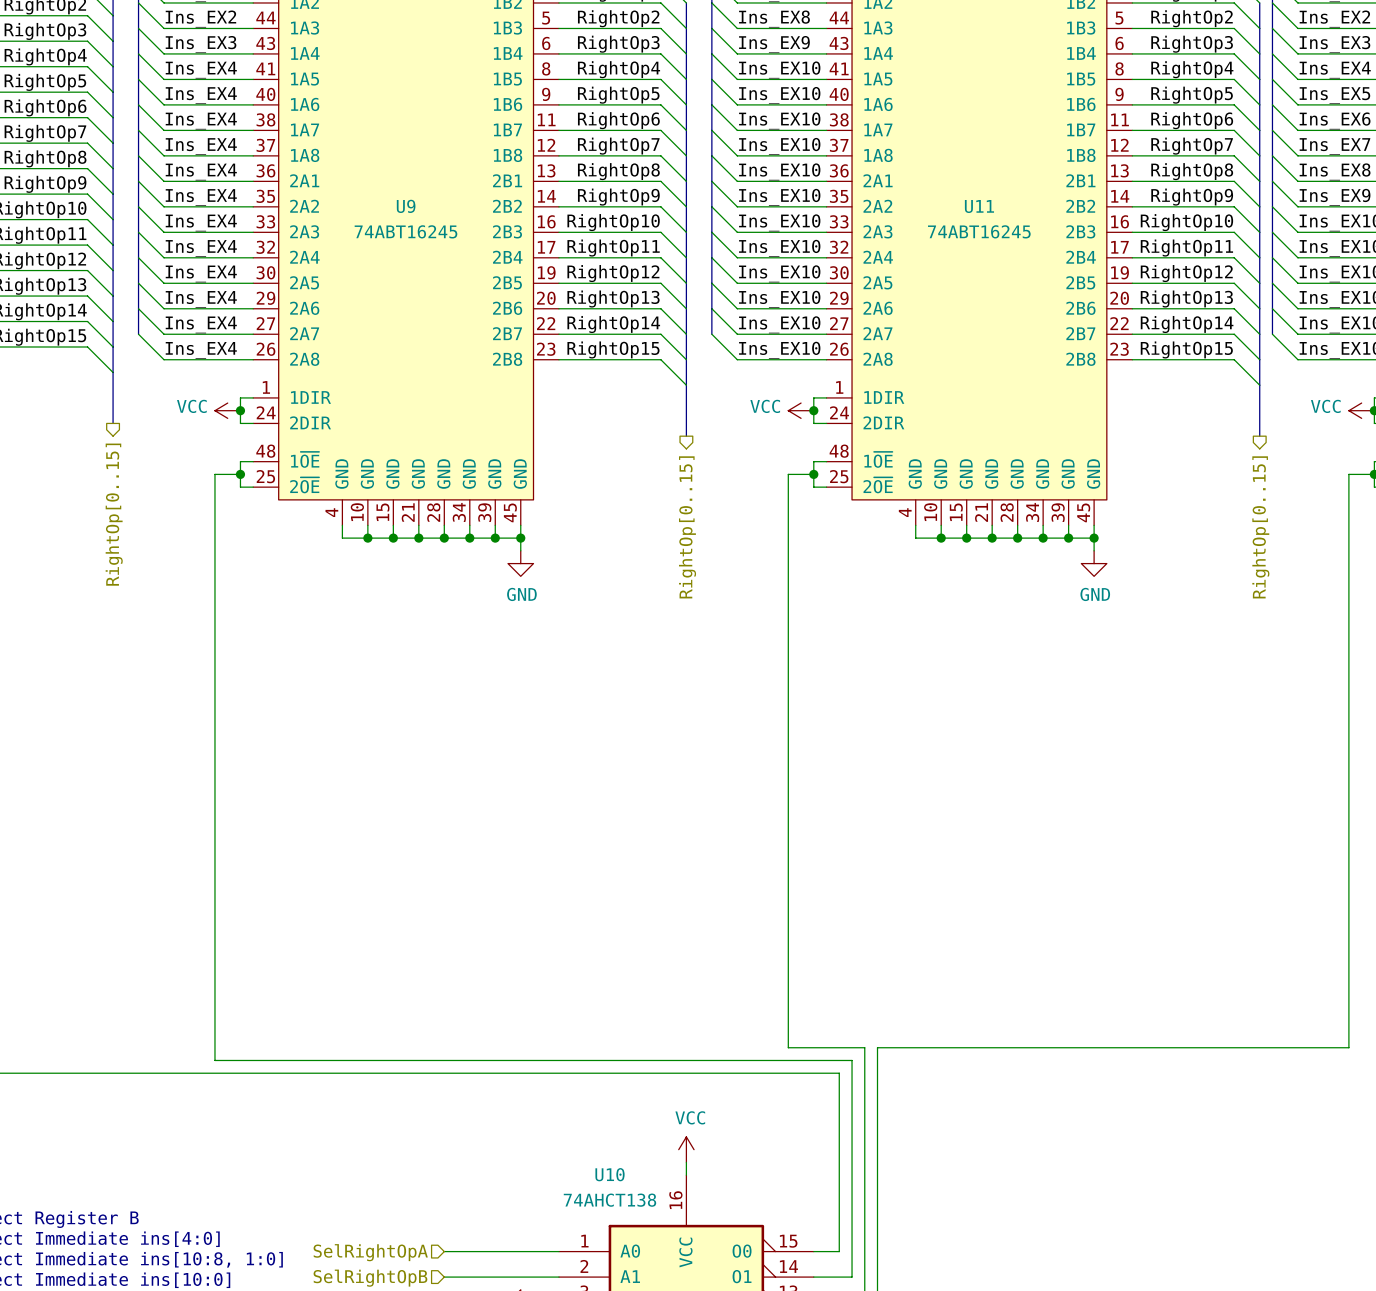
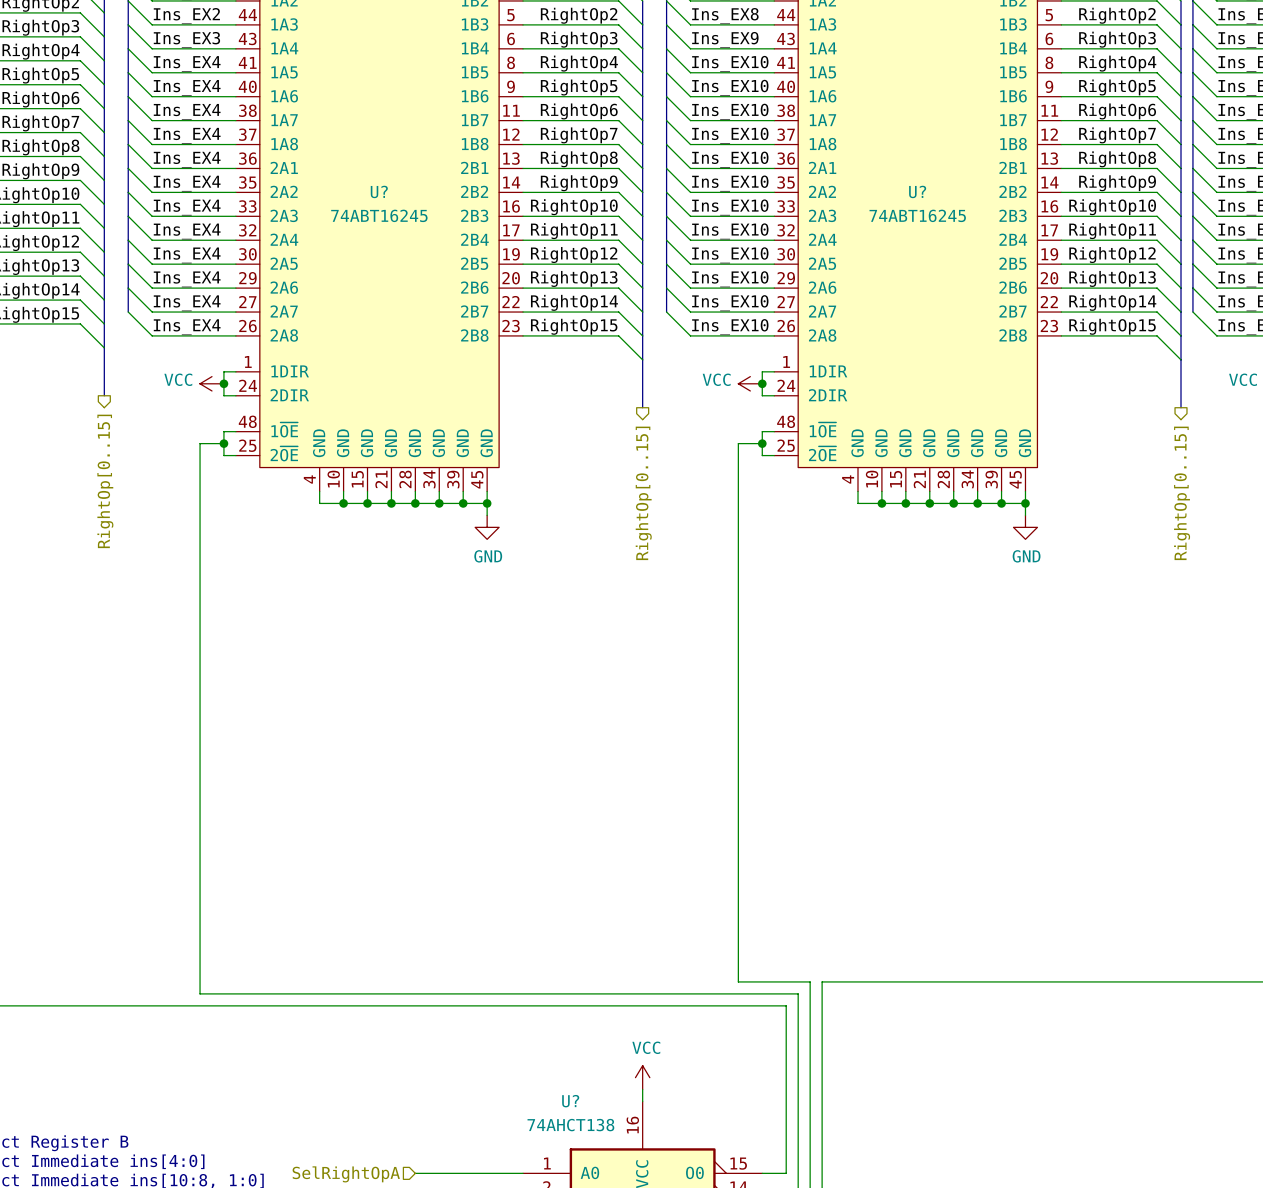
U9 name: U9 (406, 206) -> U? (379, 191)
U11 name: U11 (979, 206) -> U? (917, 191)
U10 name: U10 (610, 1174) -> U? (570, 1101)

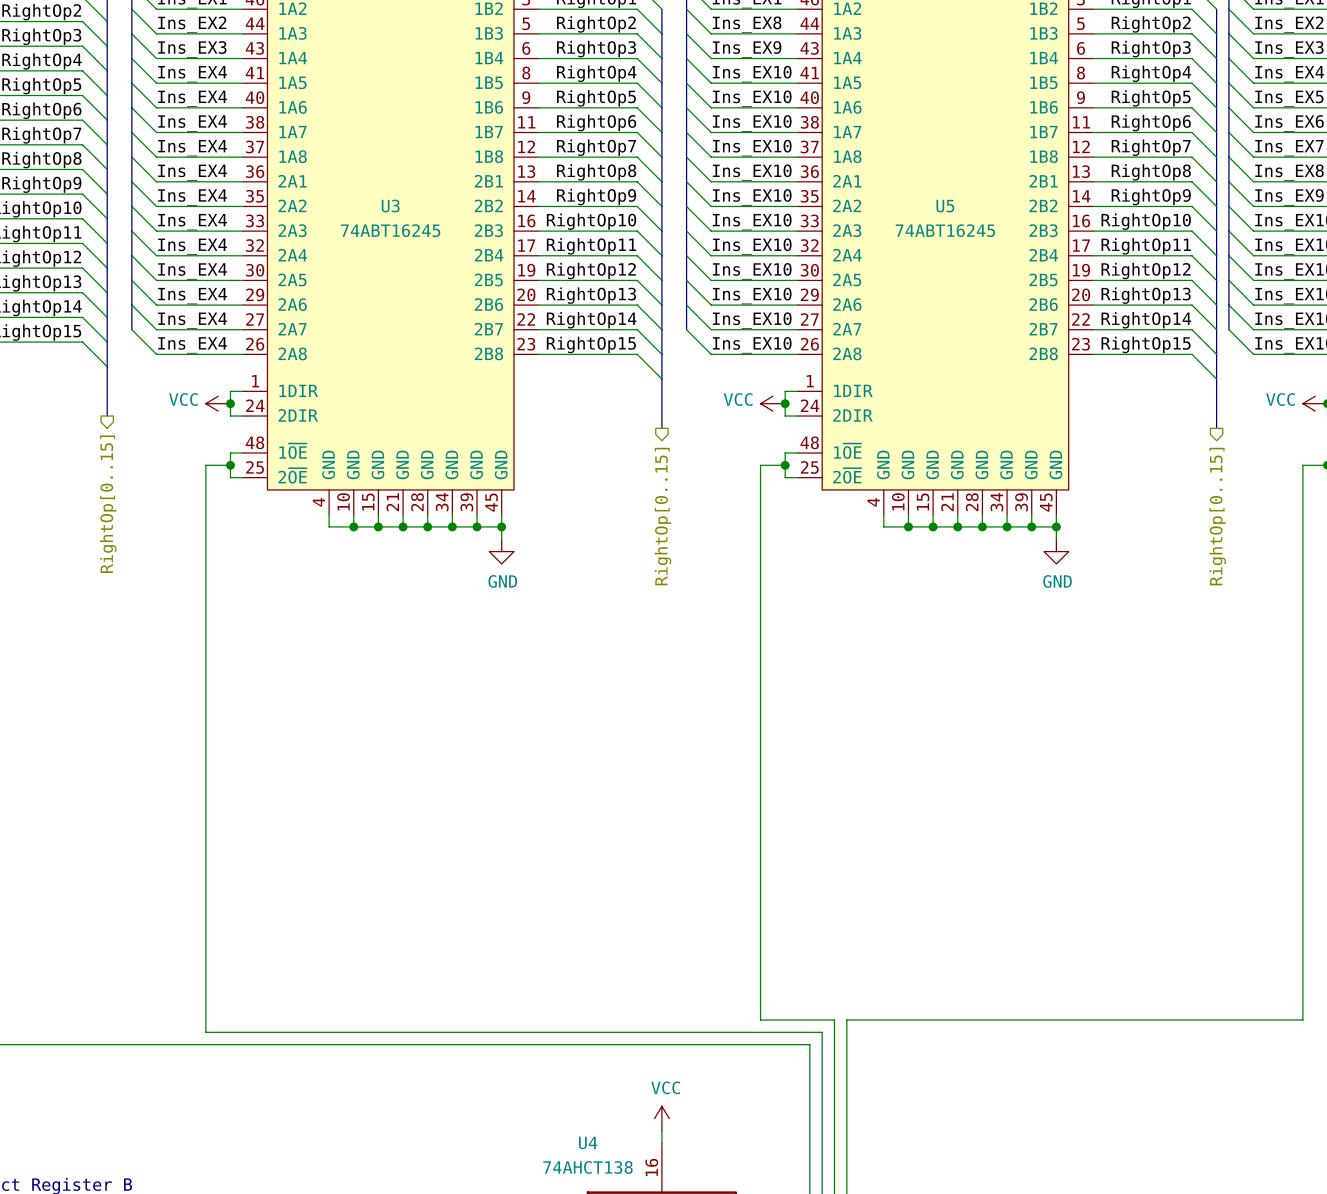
U? name: U? (379, 191) -> U3 (390, 206)
U? name: U? (917, 191) -> U5 (945, 206)
U? name: U? (570, 1101) -> U4 (588, 1142)

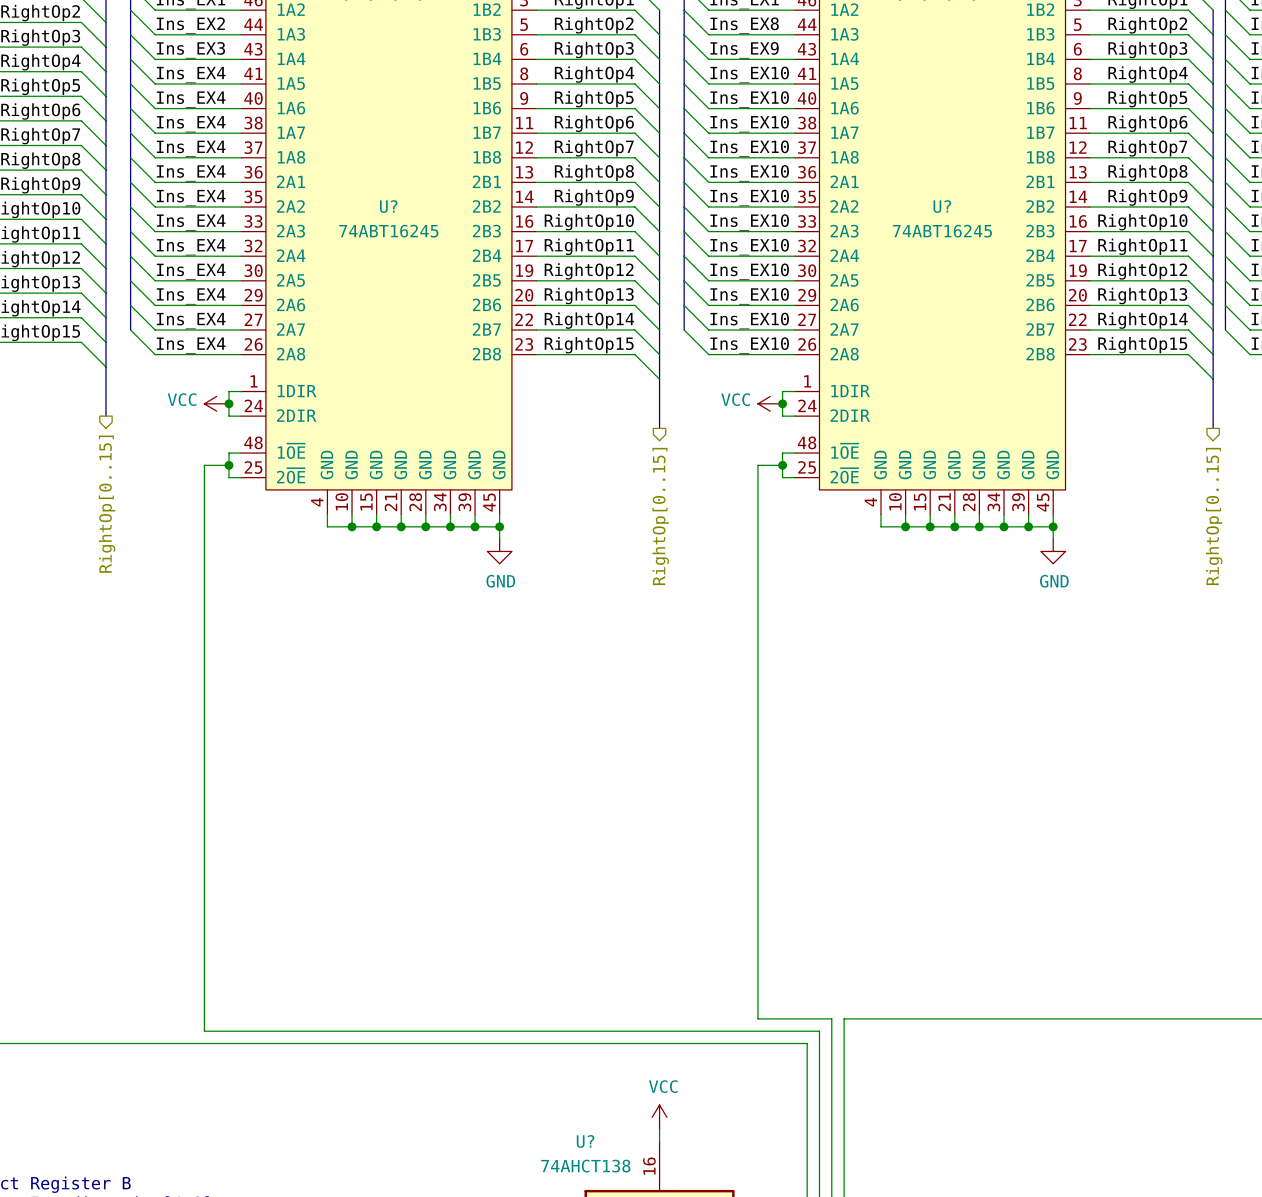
U3 name: U3 (390, 206) -> U? (388, 206)
U5 name: U5 (945, 206) -> U? (942, 206)
U4 name: U4 (588, 1142) -> U? (585, 1141)

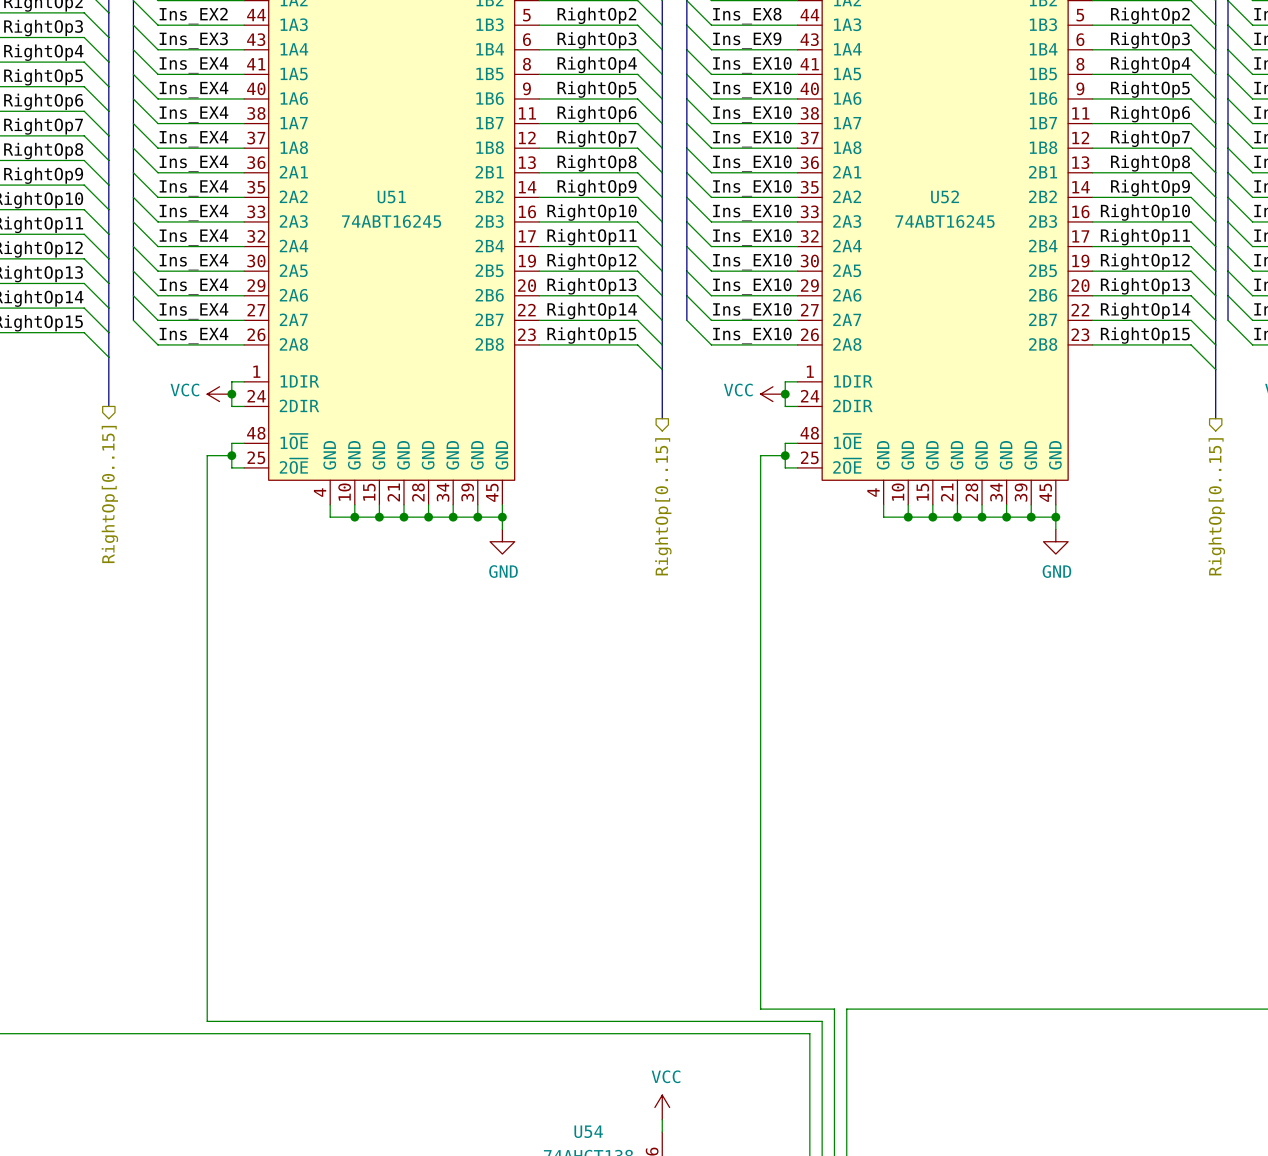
U? name: U? (388, 206) -> U51 (391, 197)
U? name: U? (942, 206) -> U52 (945, 196)
U? name: U? (585, 1141) -> U54 (588, 1131)

